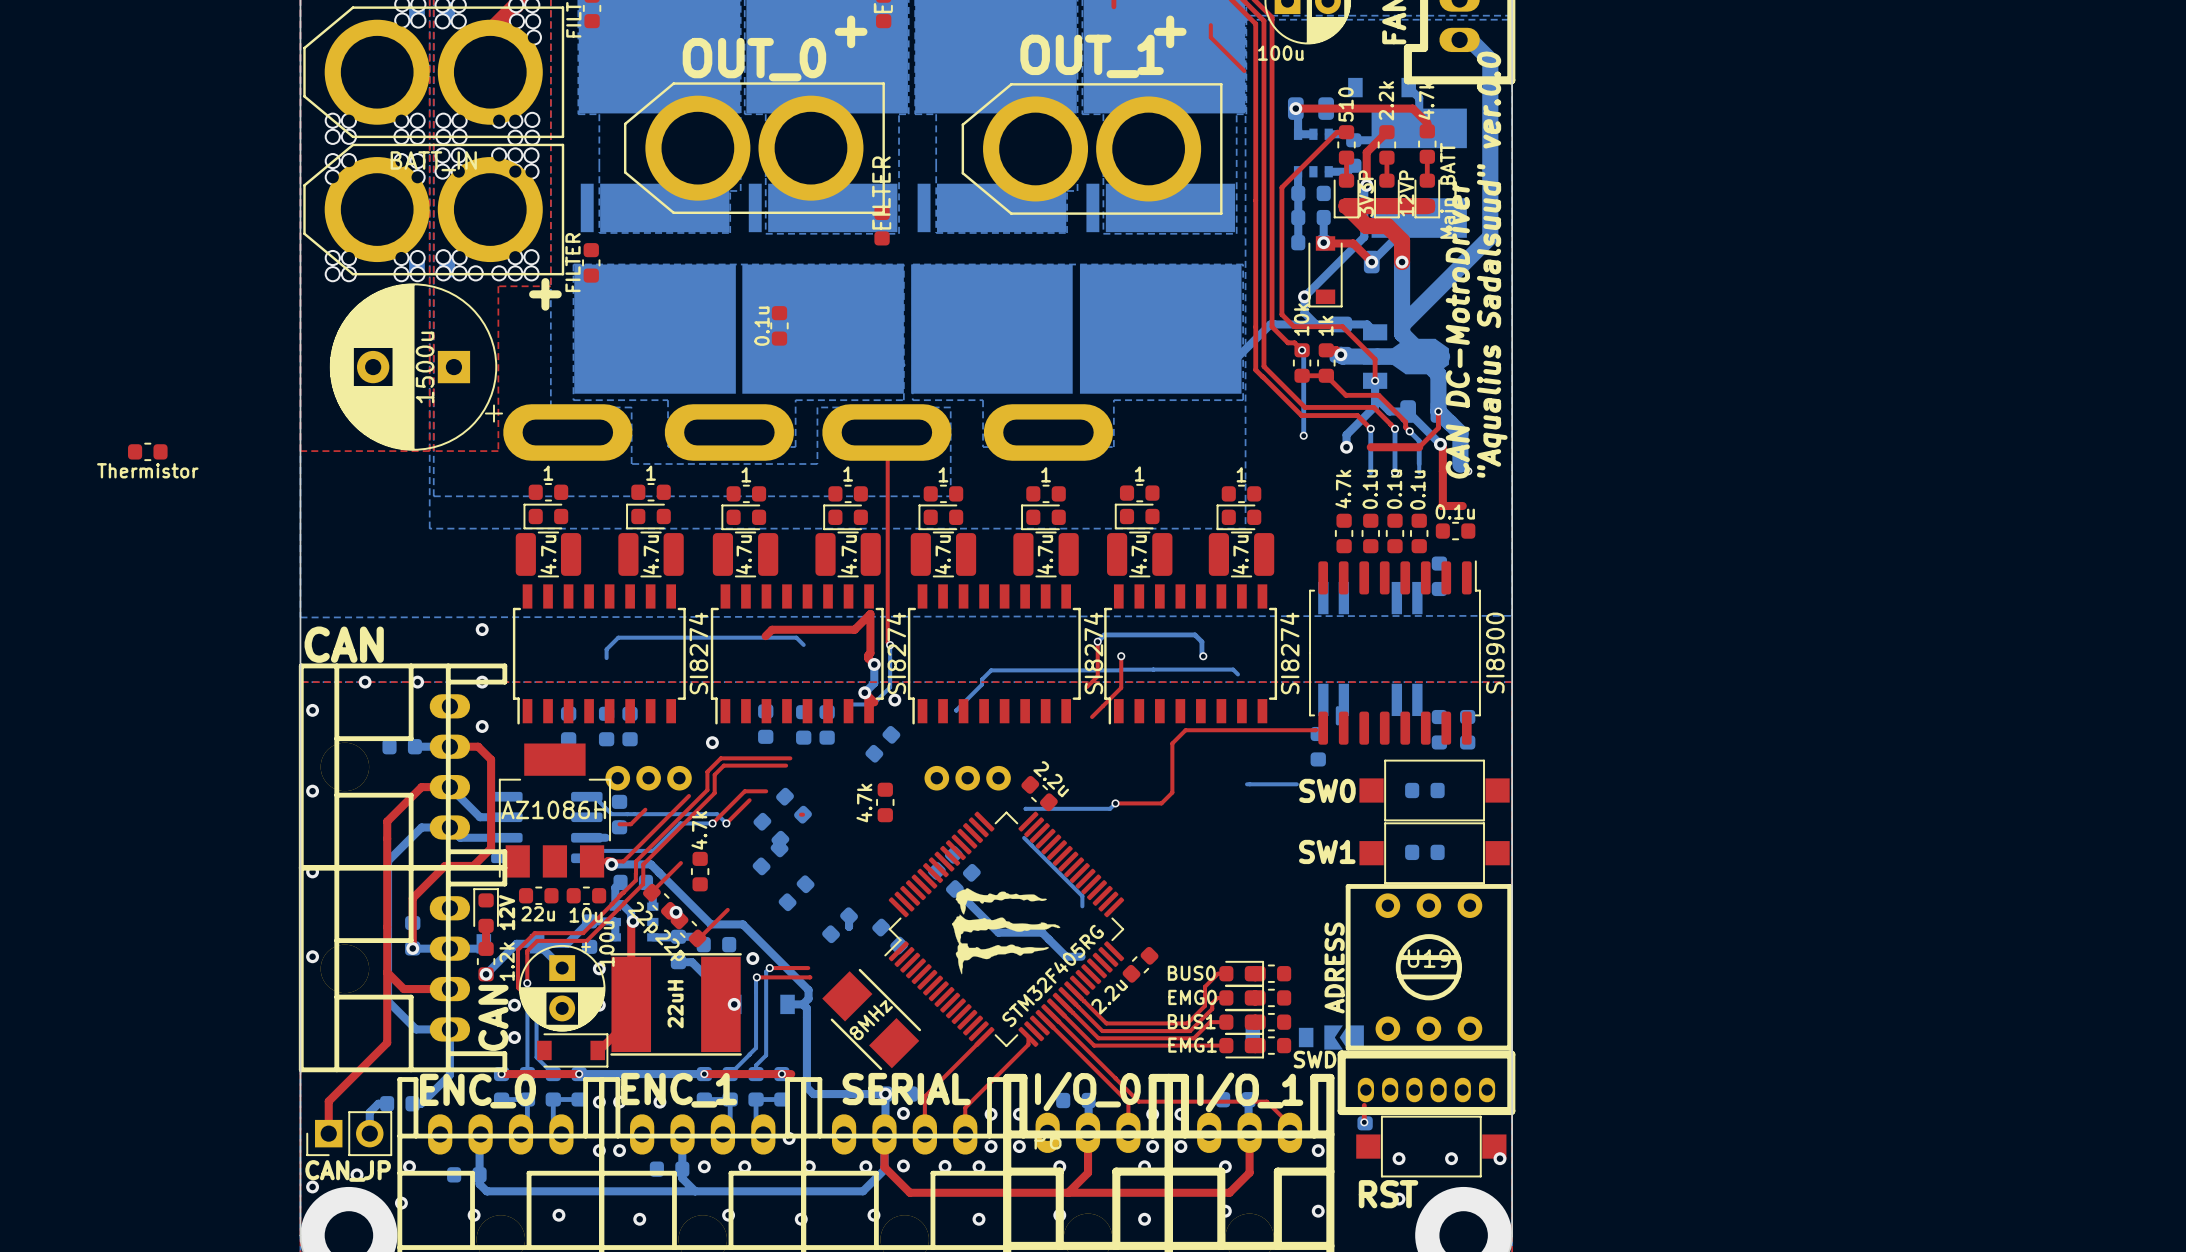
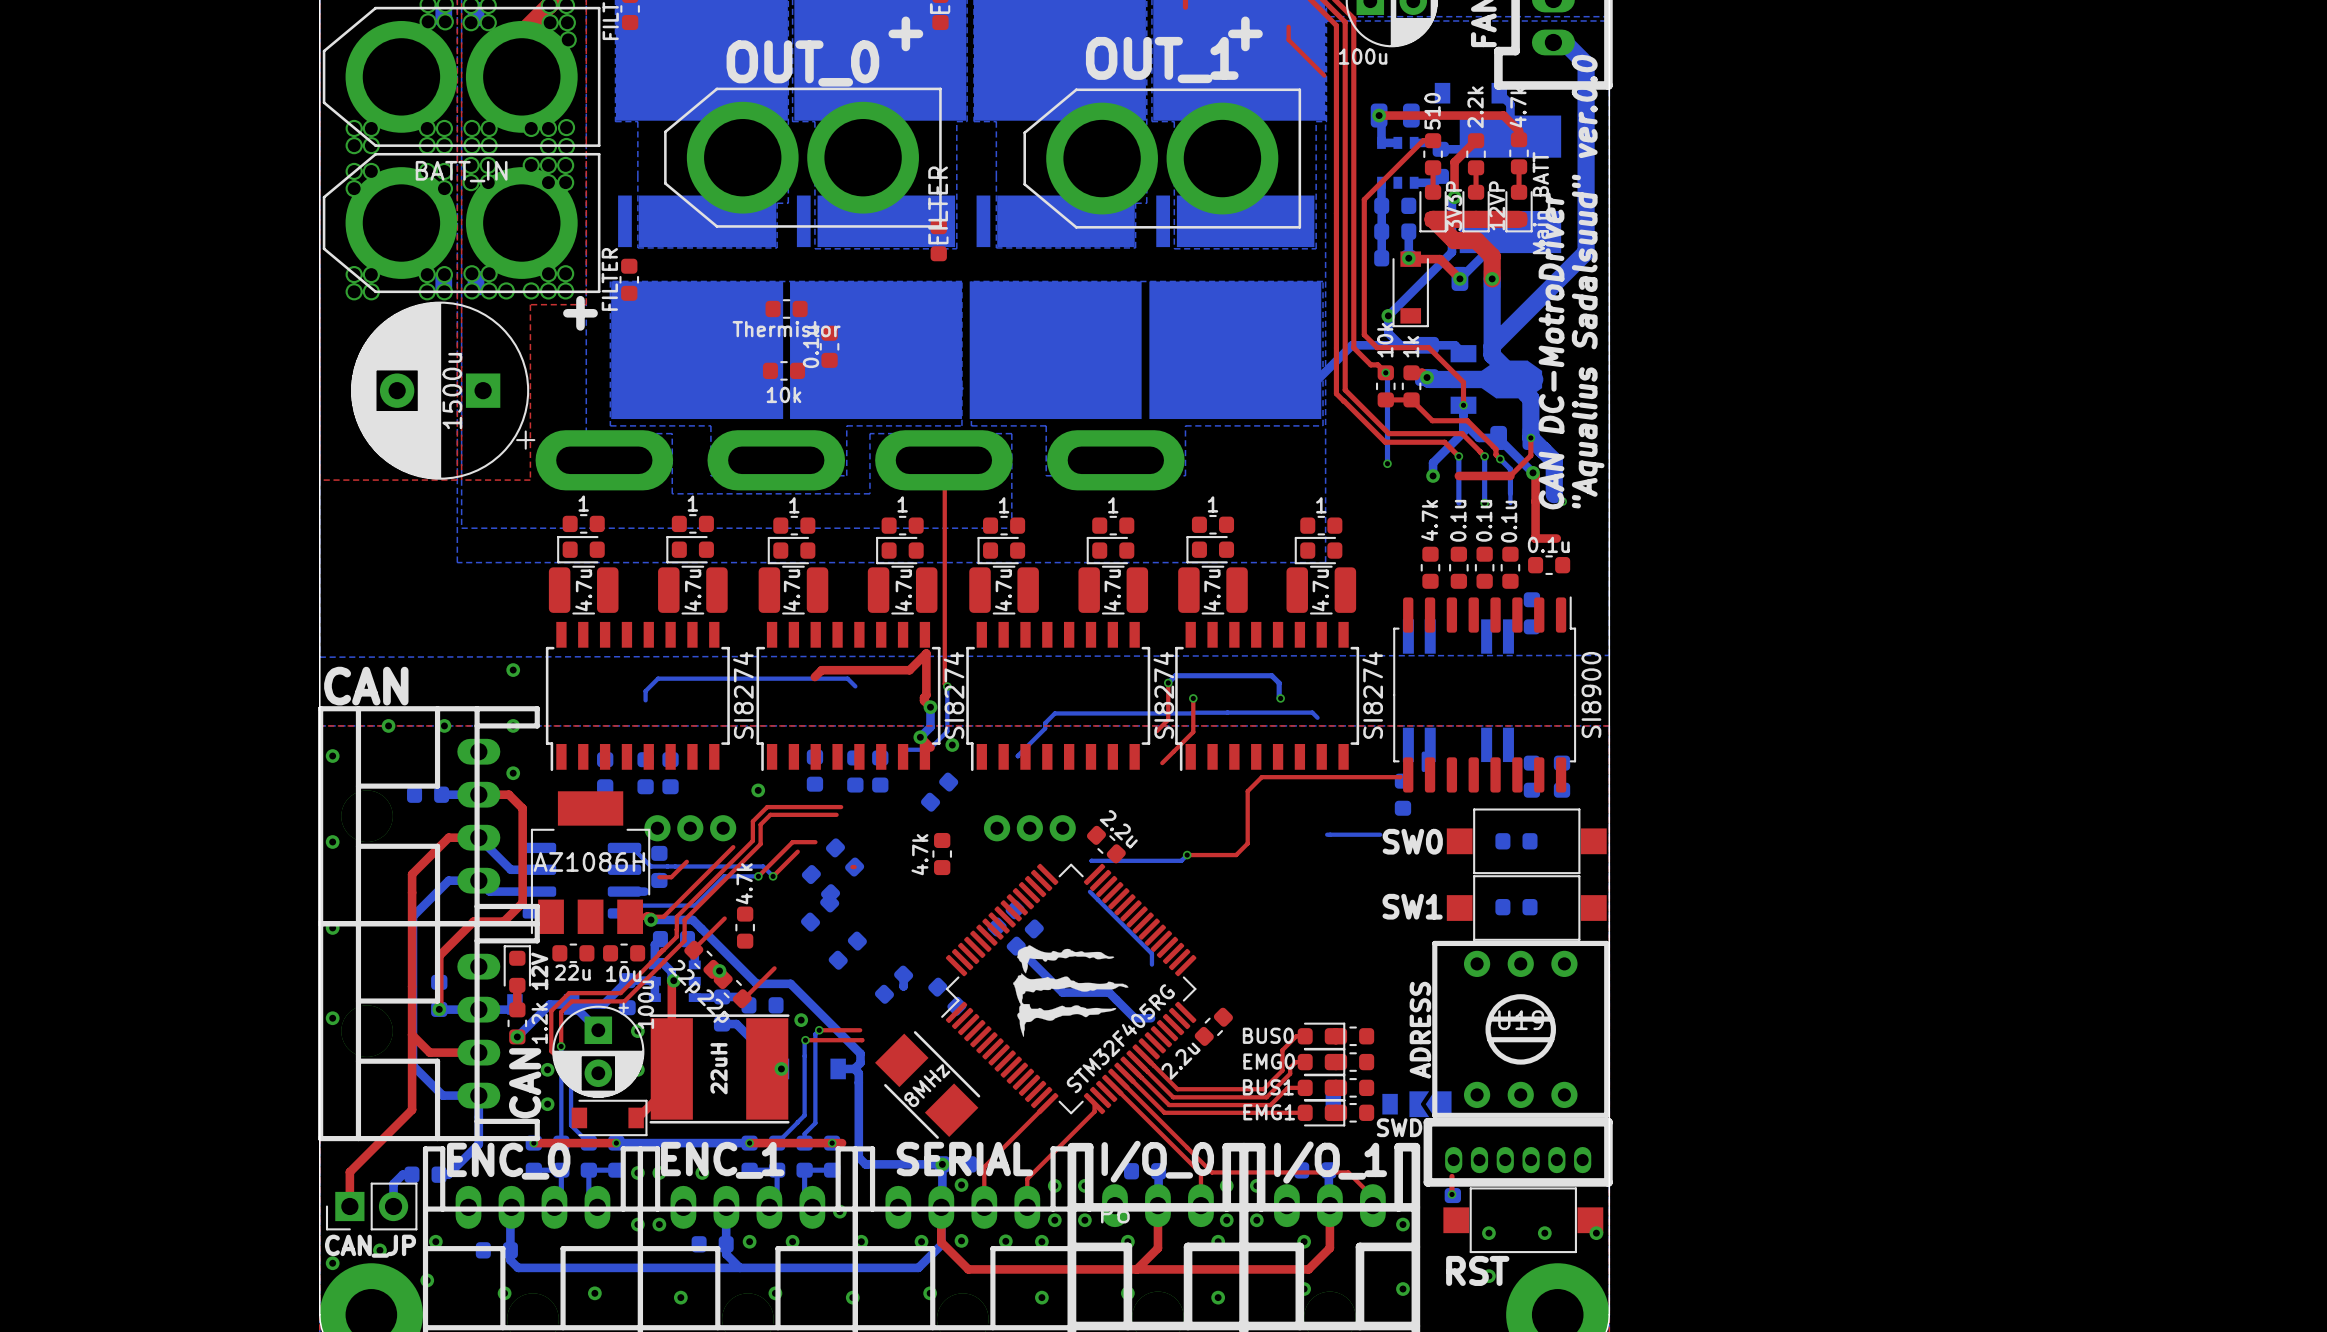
part: none -> Thermistor (786, 308)
part: none -> 10k (784, 370)
part: Thermistor (147, 451) -> none

